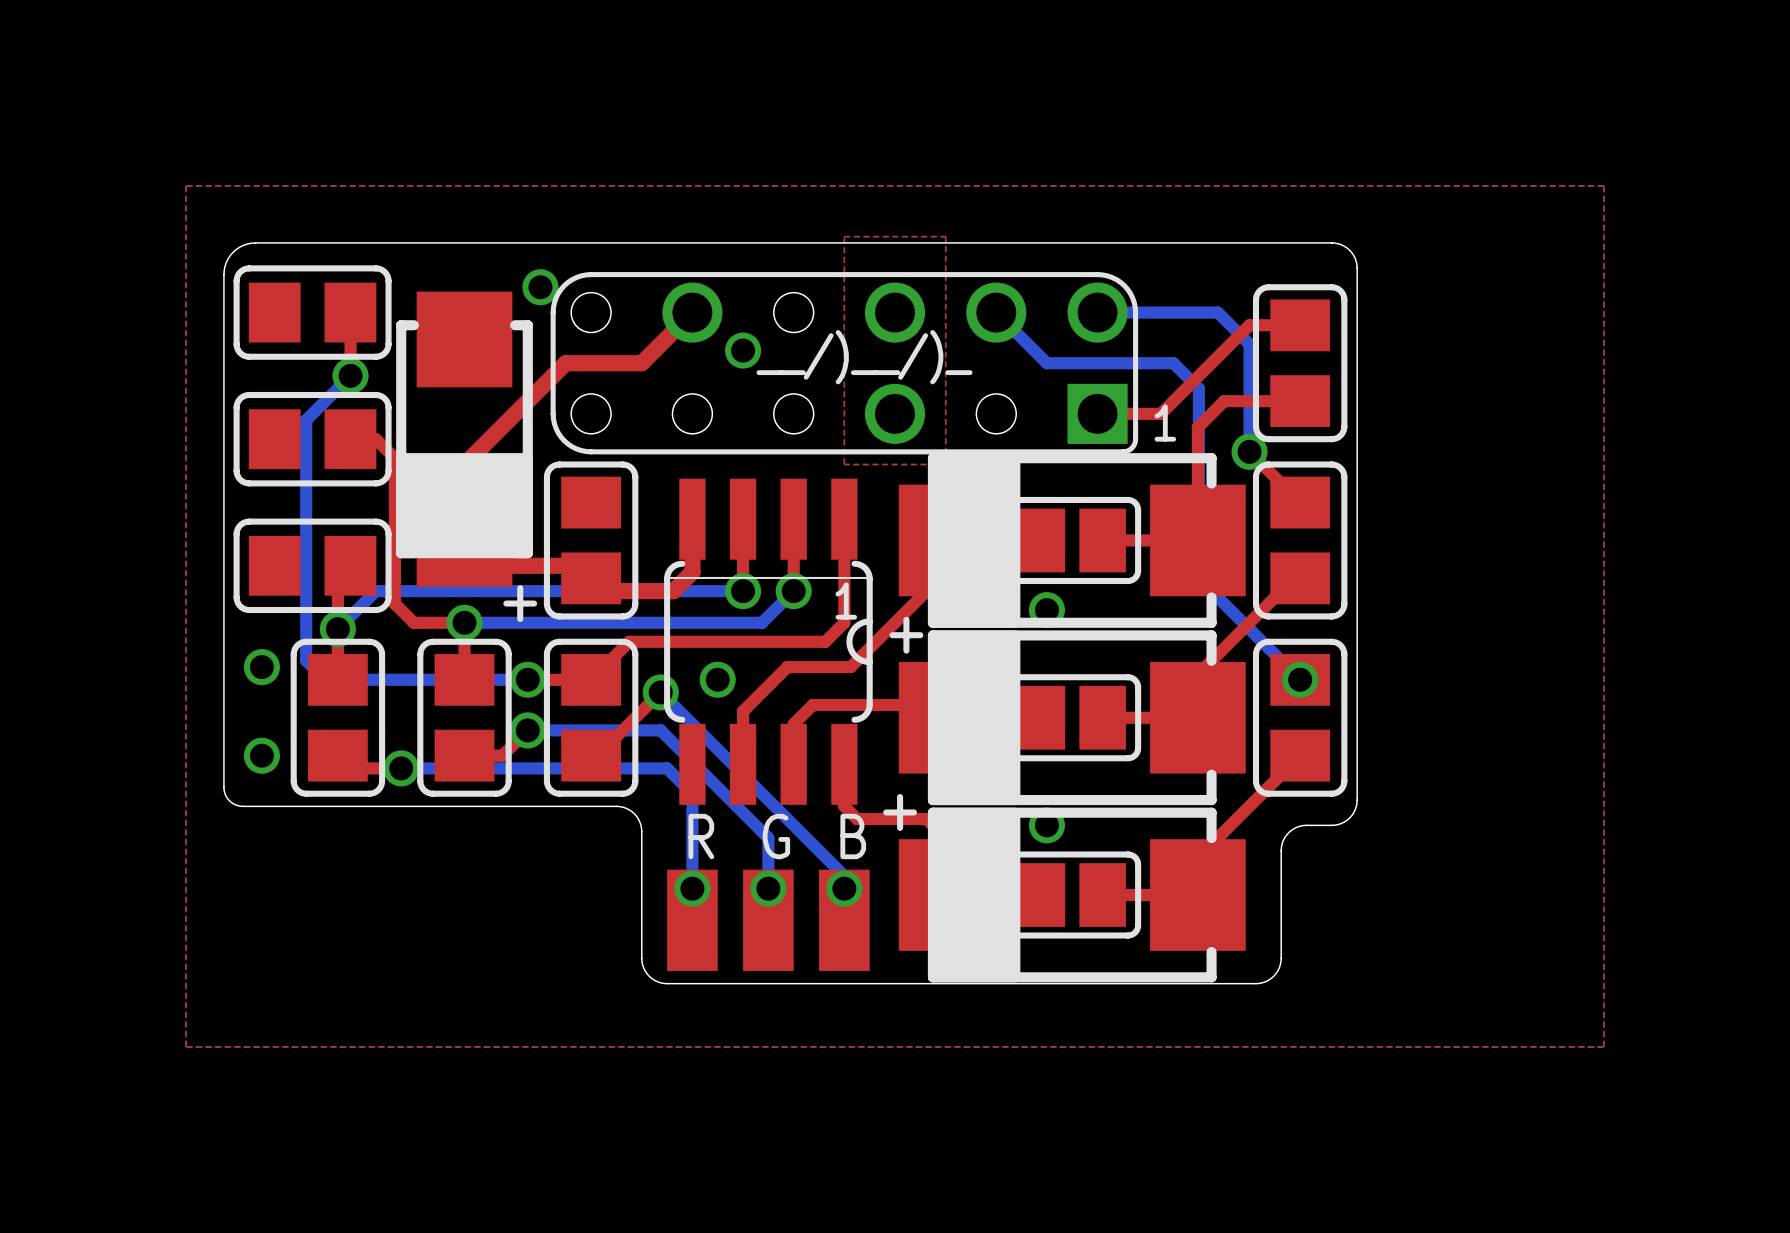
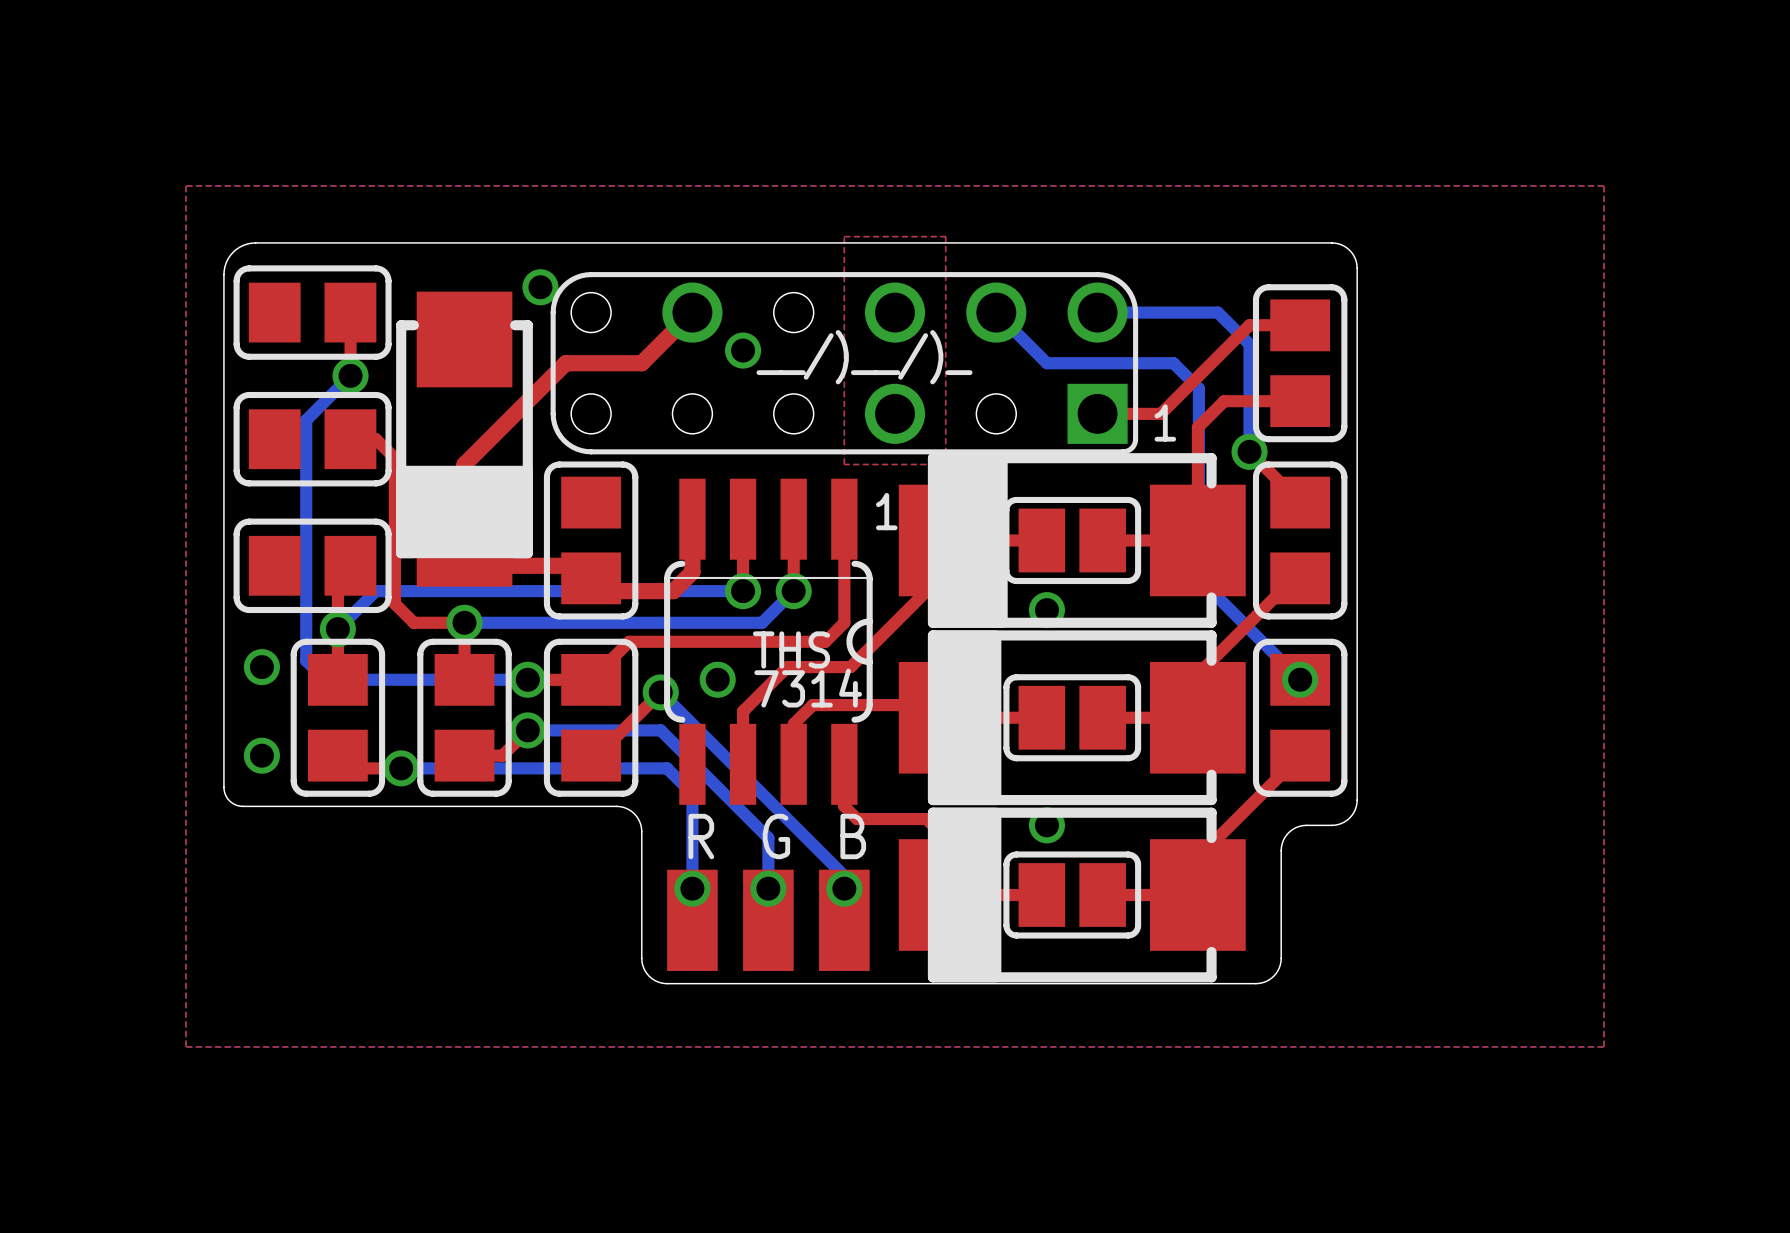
drawing shape: [396, 453, 533, 559] -> [396, 465, 533, 559]
drawing shape: [927, 453, 1021, 628] -> [927, 453, 1008, 628]
text position: 1 (846, 601) -> 1 (886, 511)
text: + (520, 603) -> none
drawing shape: [927, 630, 1021, 806] -> [927, 630, 1002, 806]
text: + (906, 635) -> none
text: none -> THS (791, 649)
text: none -> 7314 (808, 688)
drawing shape: [927, 807, 1021, 983] -> [927, 807, 1002, 983]
text: + (900, 812) -> none

